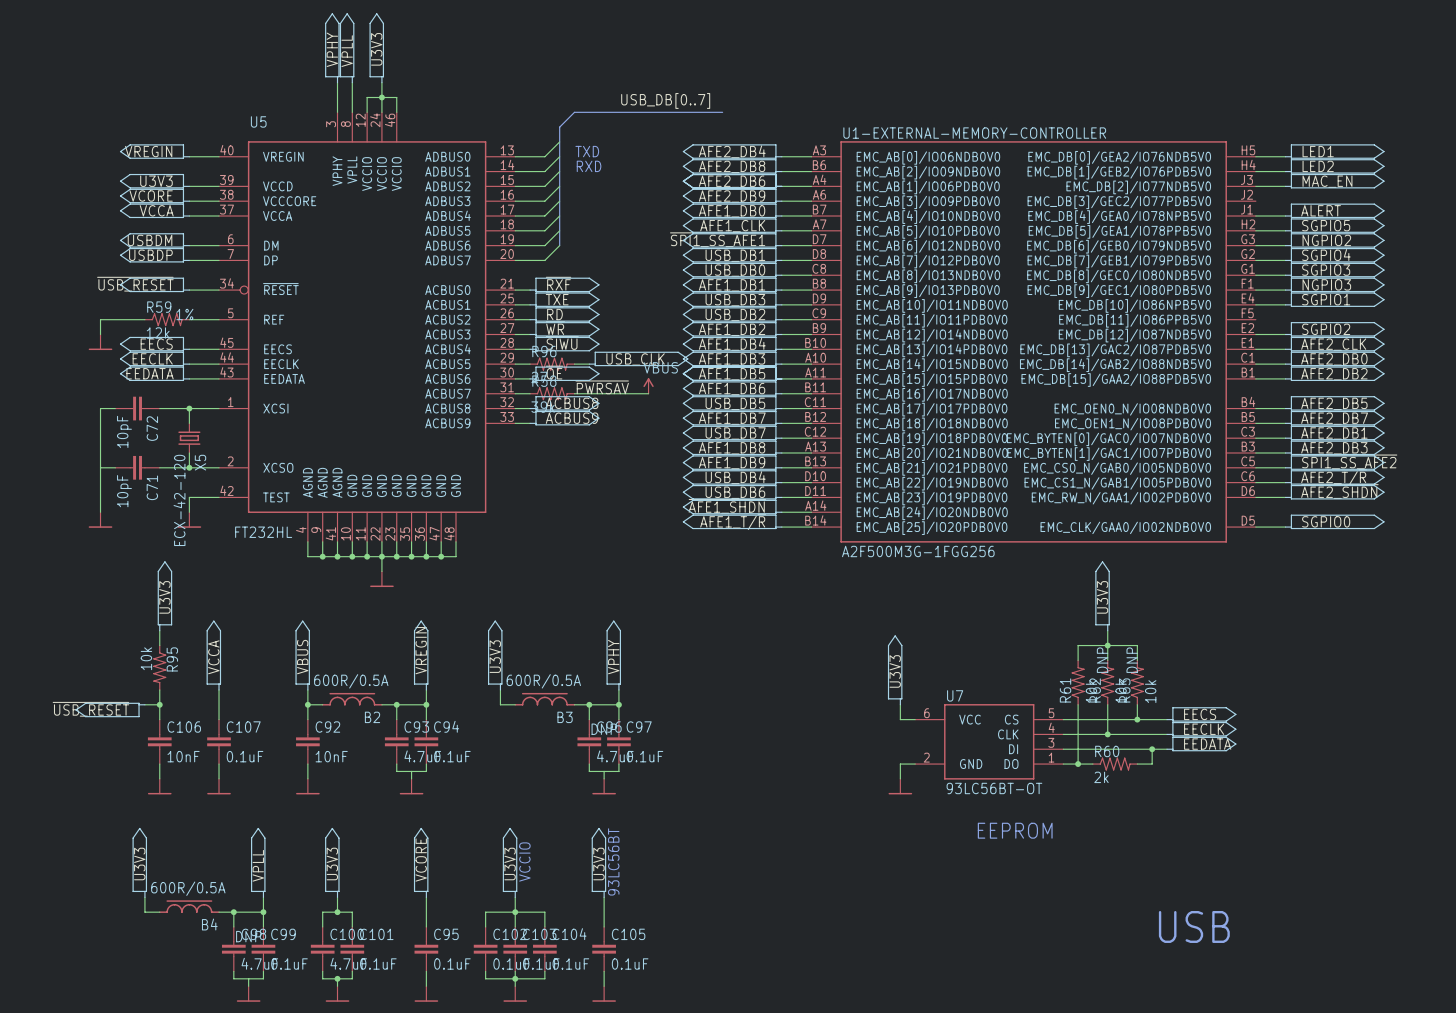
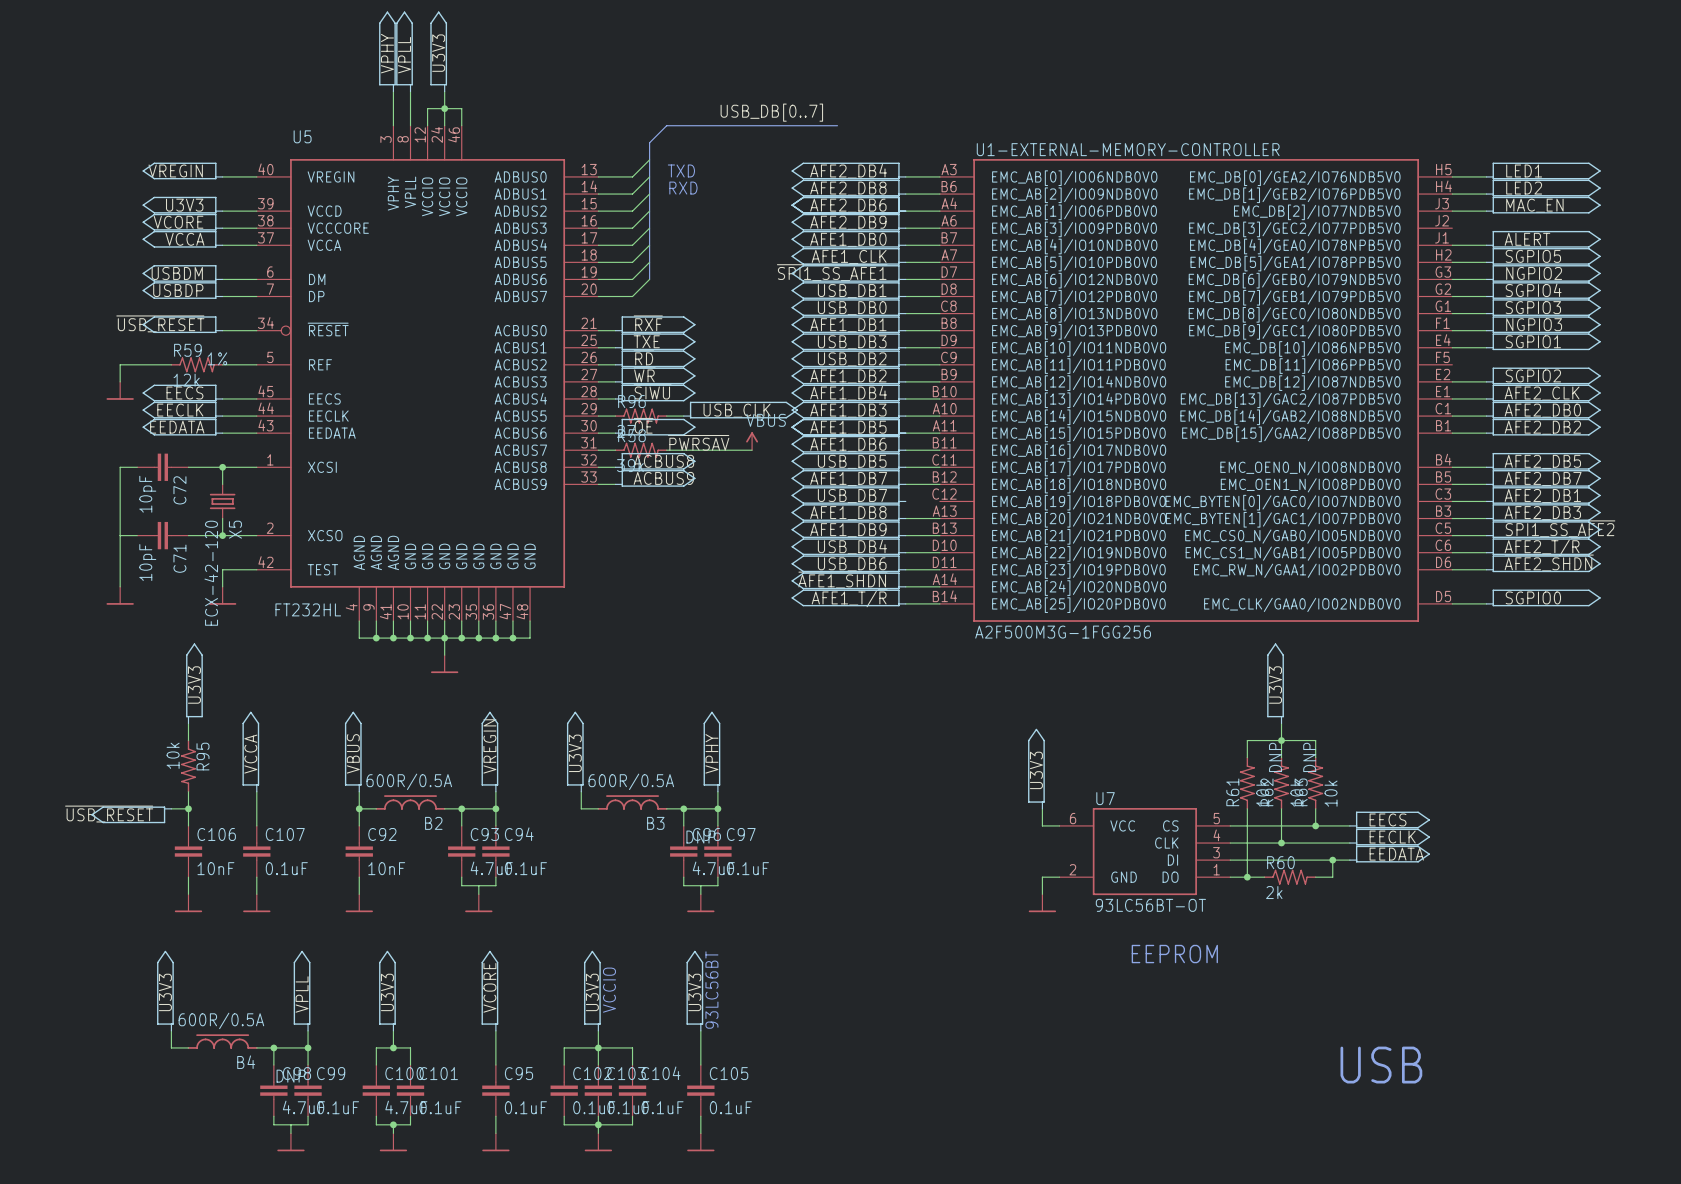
wire: (781, 438) (811, 438) -> none

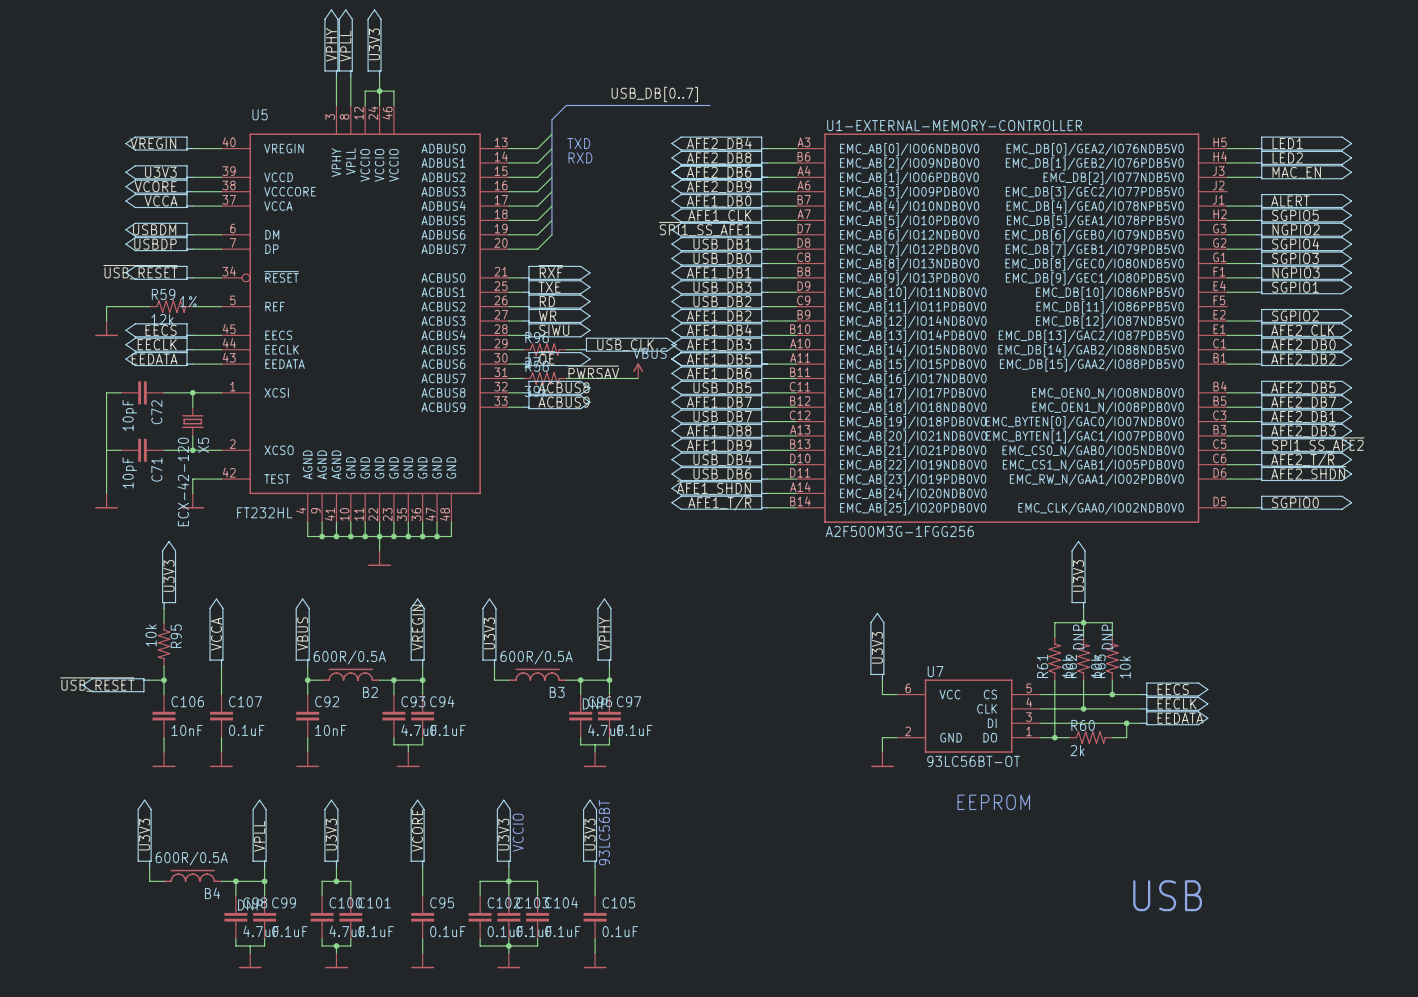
wire: none -> (767, 421) (796, 421)

